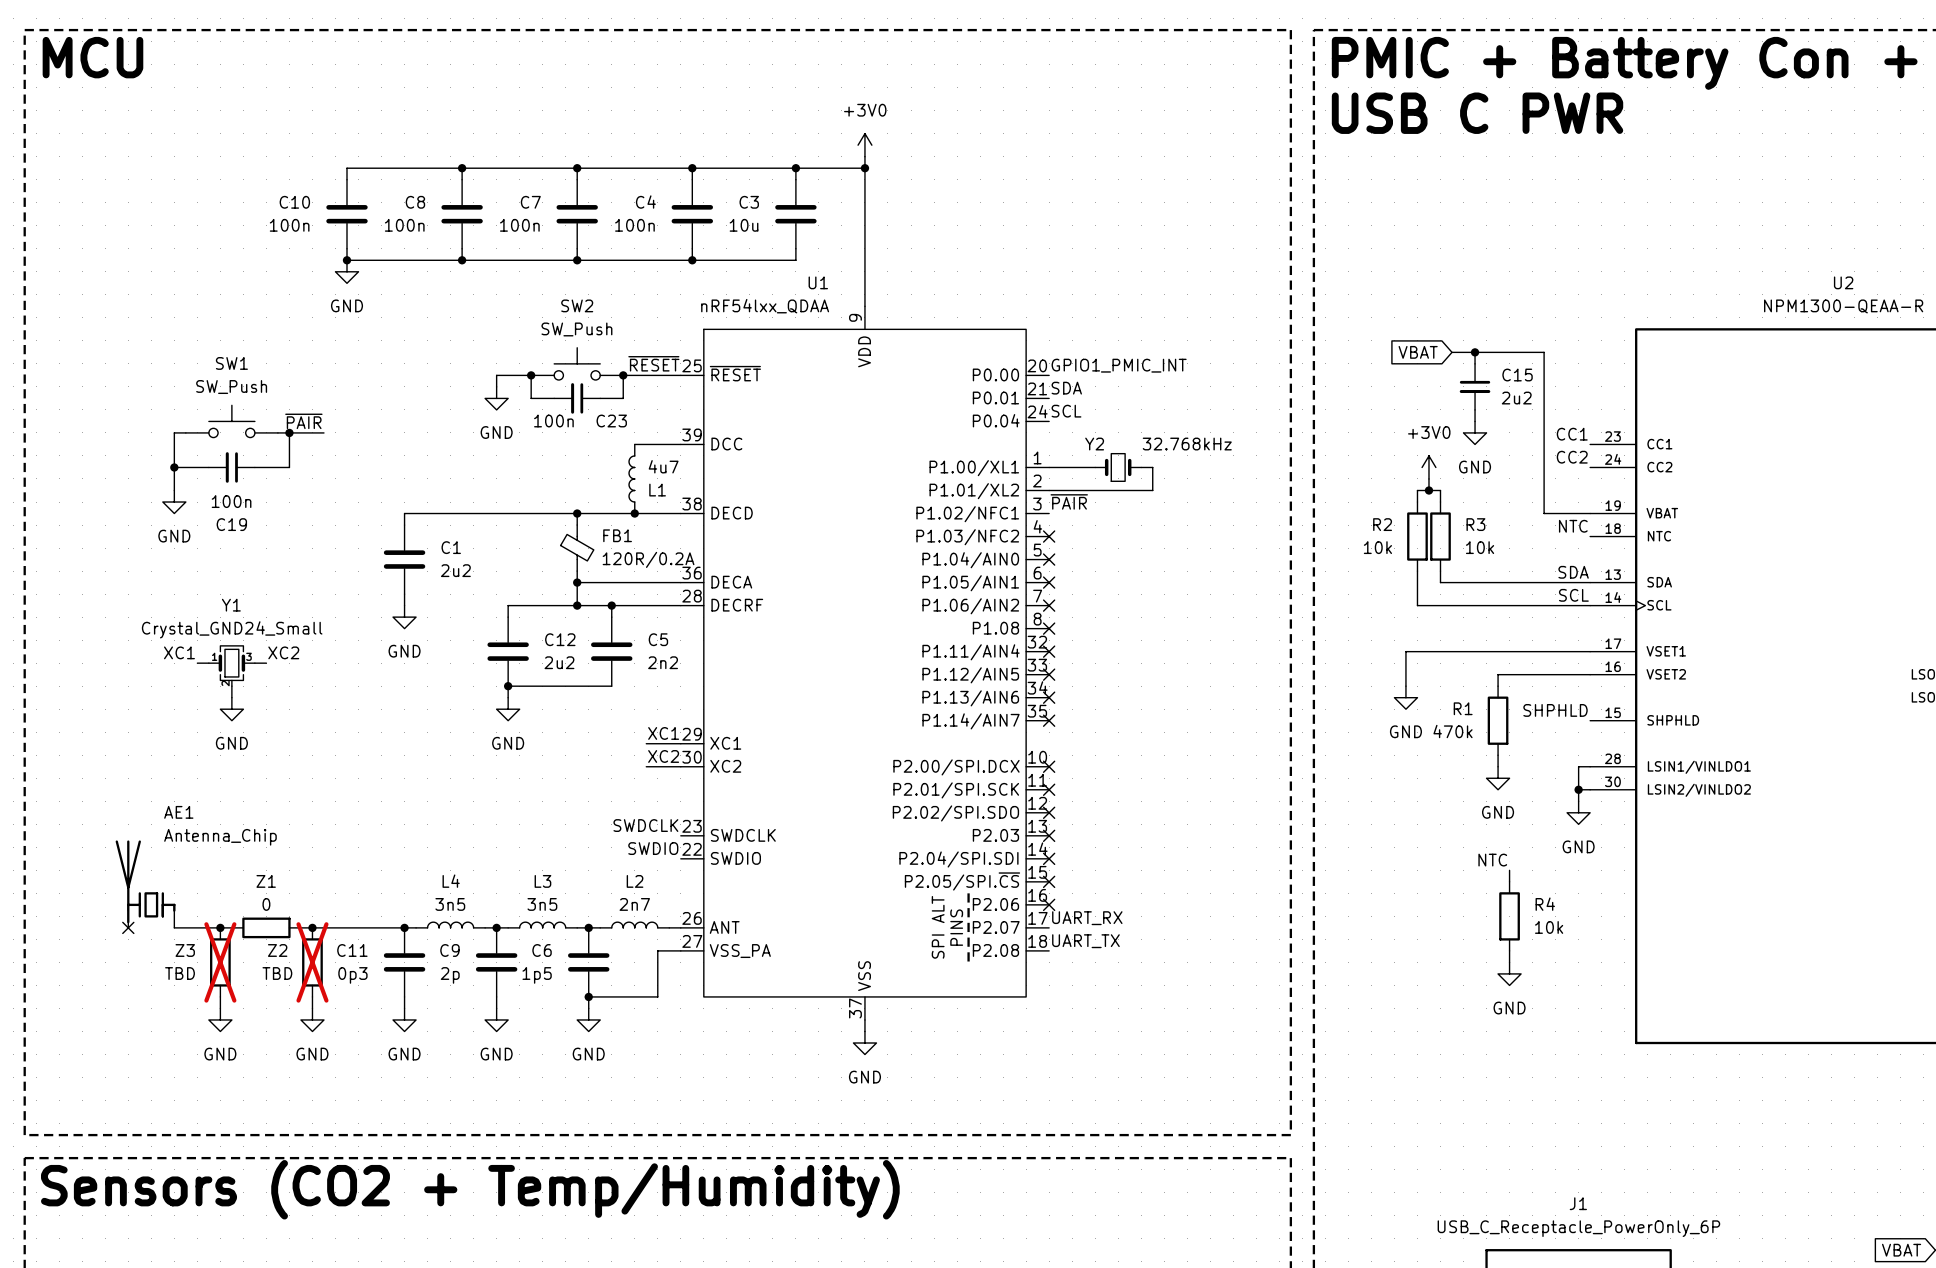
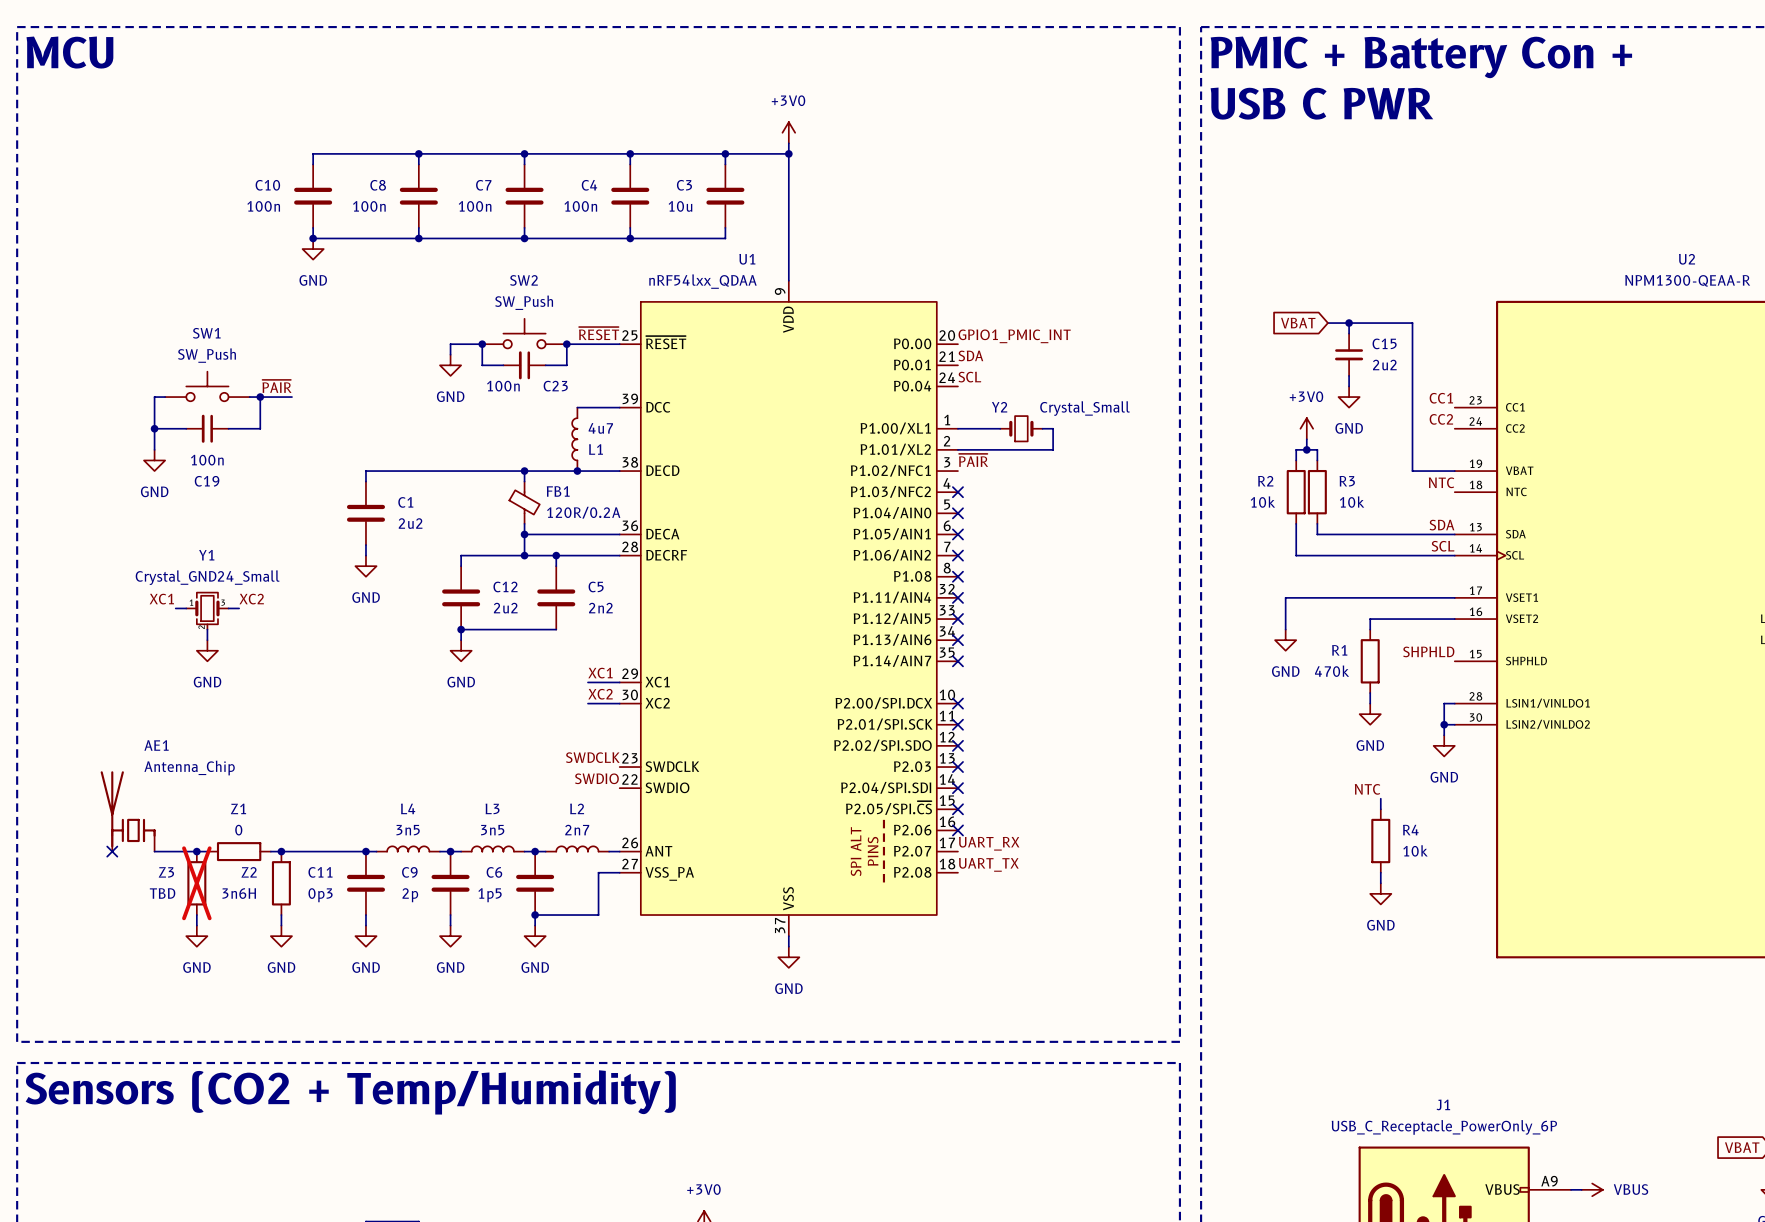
Y2 value: 32.768kHz (1187, 444) -> Crystal_Small (1085, 408)
Z2 do-not-place cross: (312, 962) -> none
Z2 value: TBD (277, 973) -> 3n6H (239, 893)

